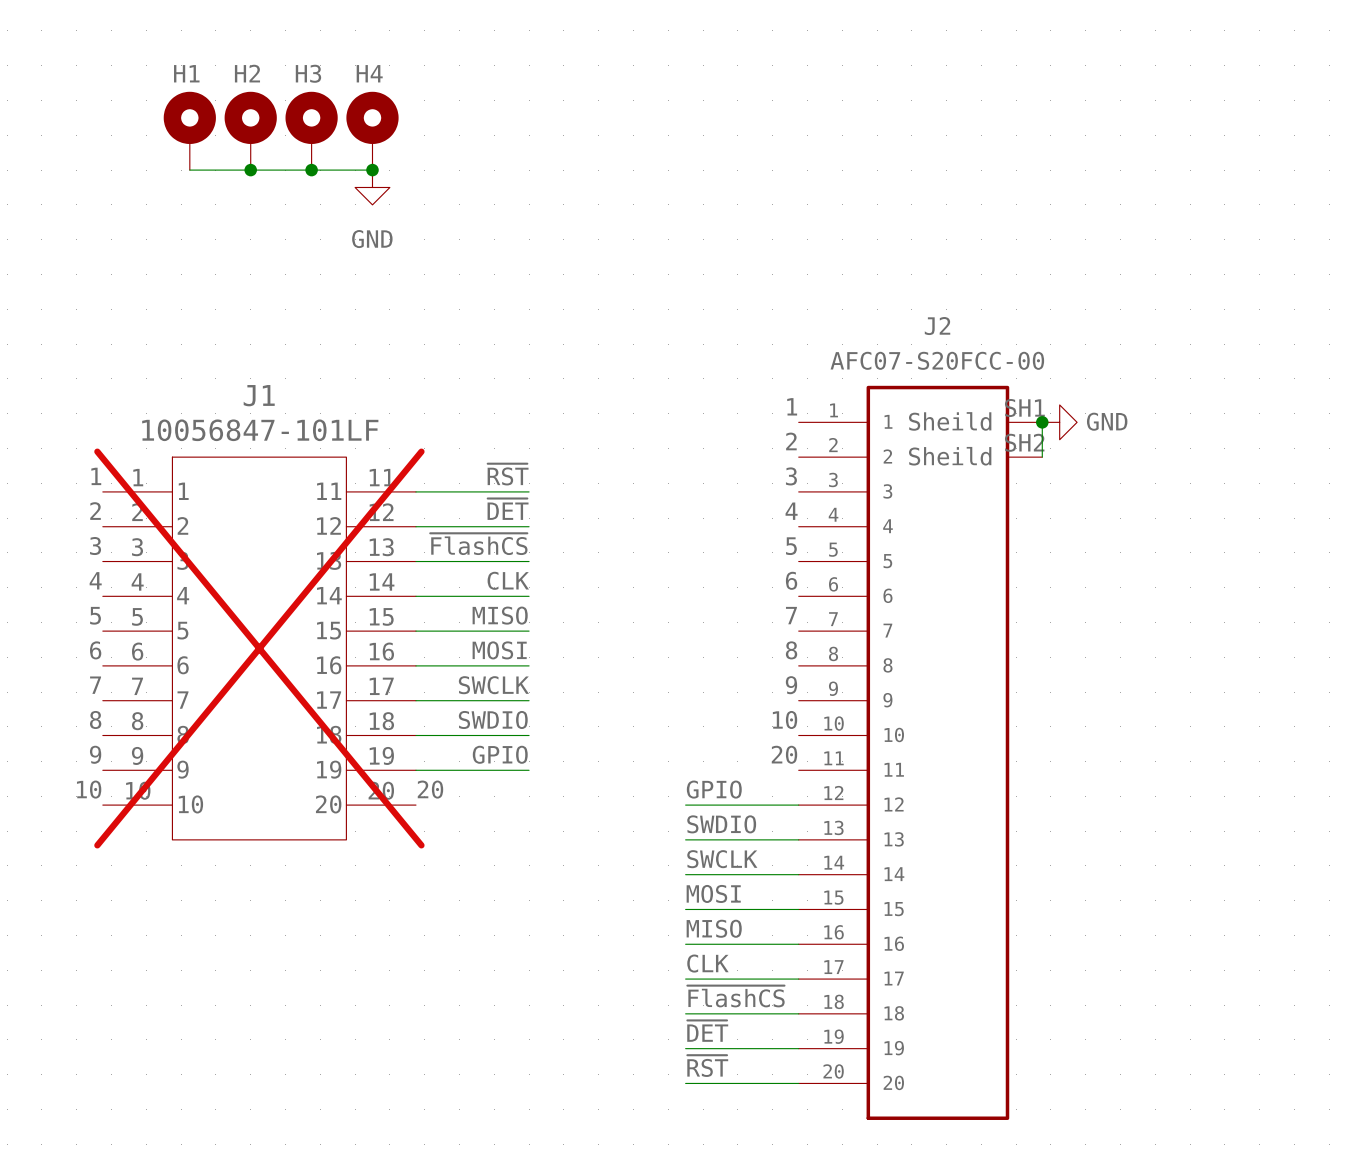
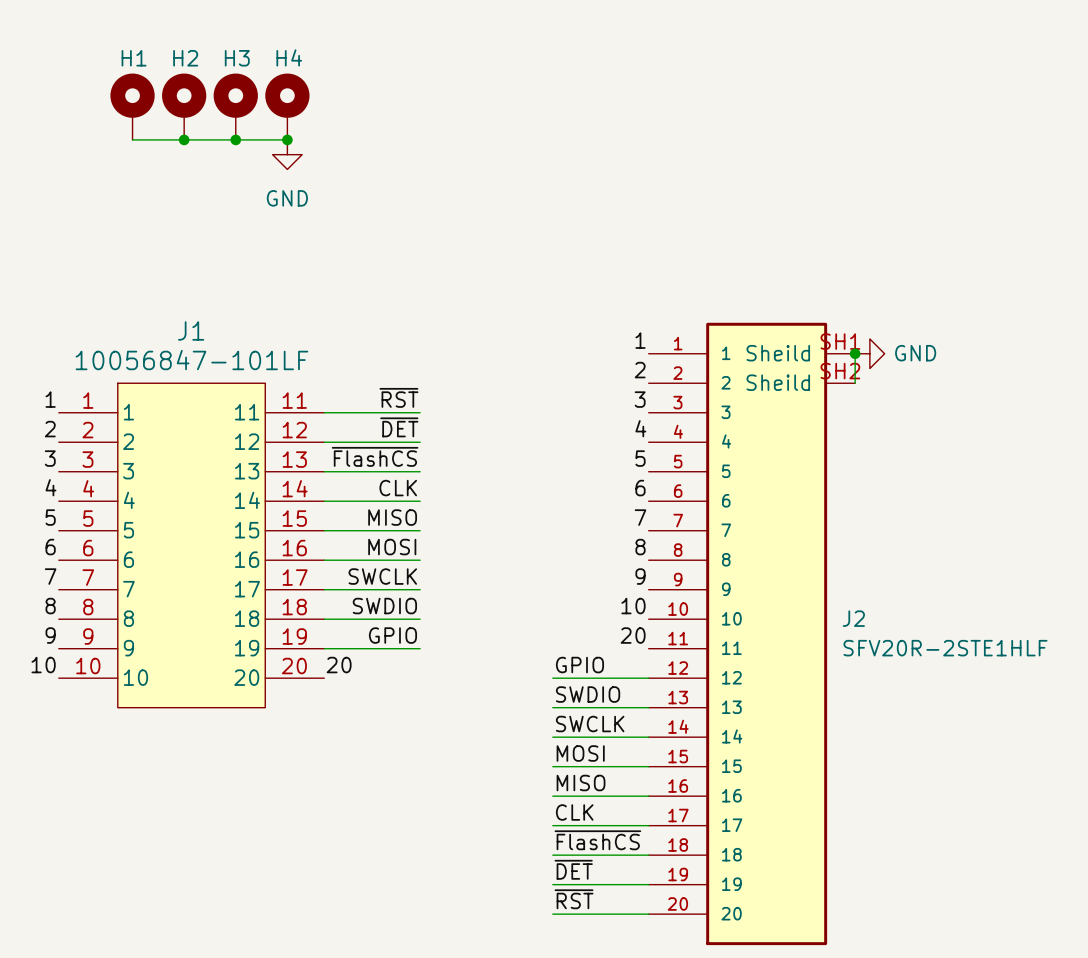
J2 name position: J2 (937, 326) -> J2 (853, 618)
J2 value: AFC07-S20FCC-00 (937, 360) -> SFV20R-2STE1HLF (945, 648)
J1 do-not-place cross: (259, 648) -> none

